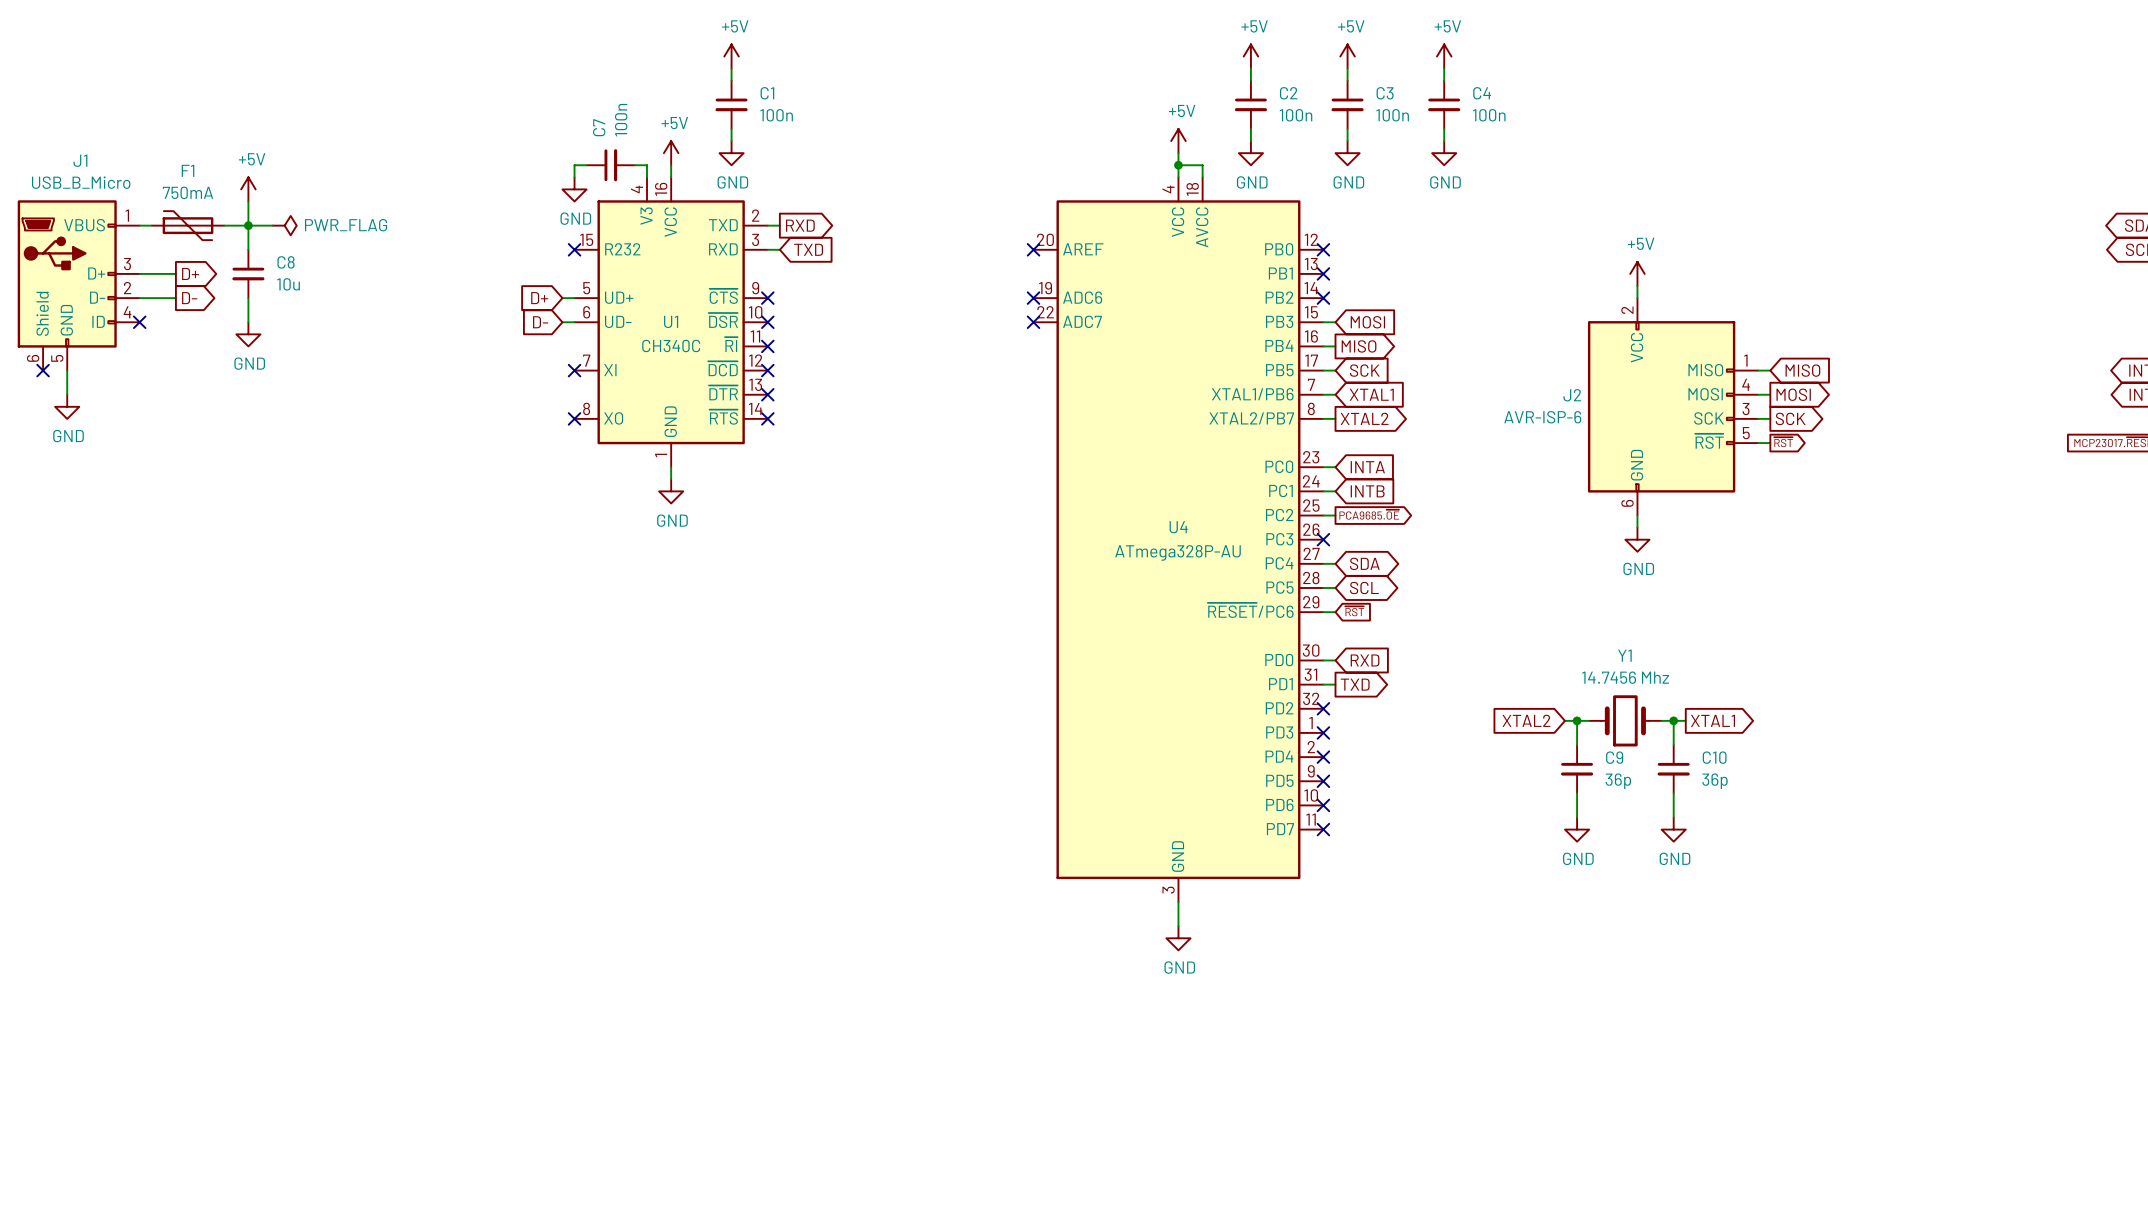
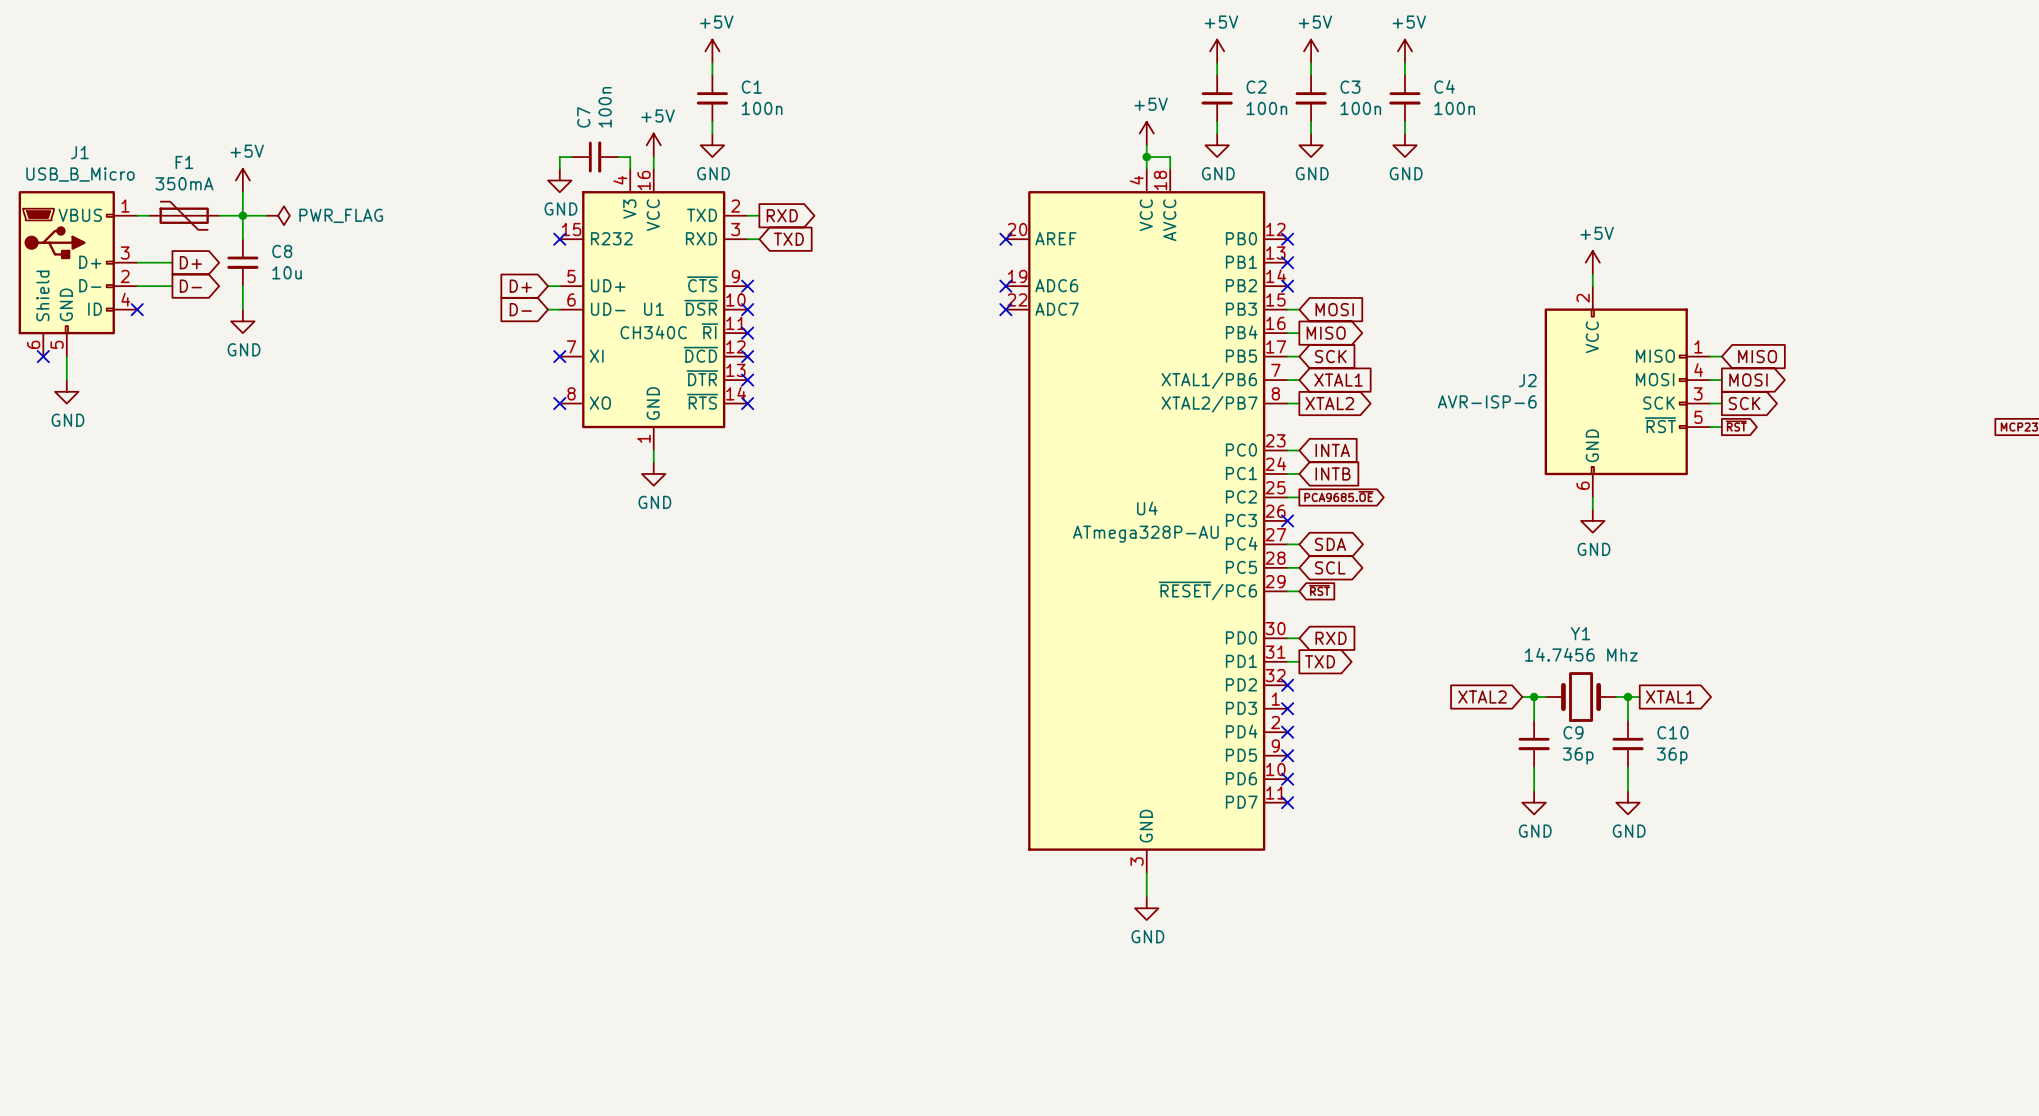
F1 value: 750mA (188, 192) -> 350mA (184, 183)

